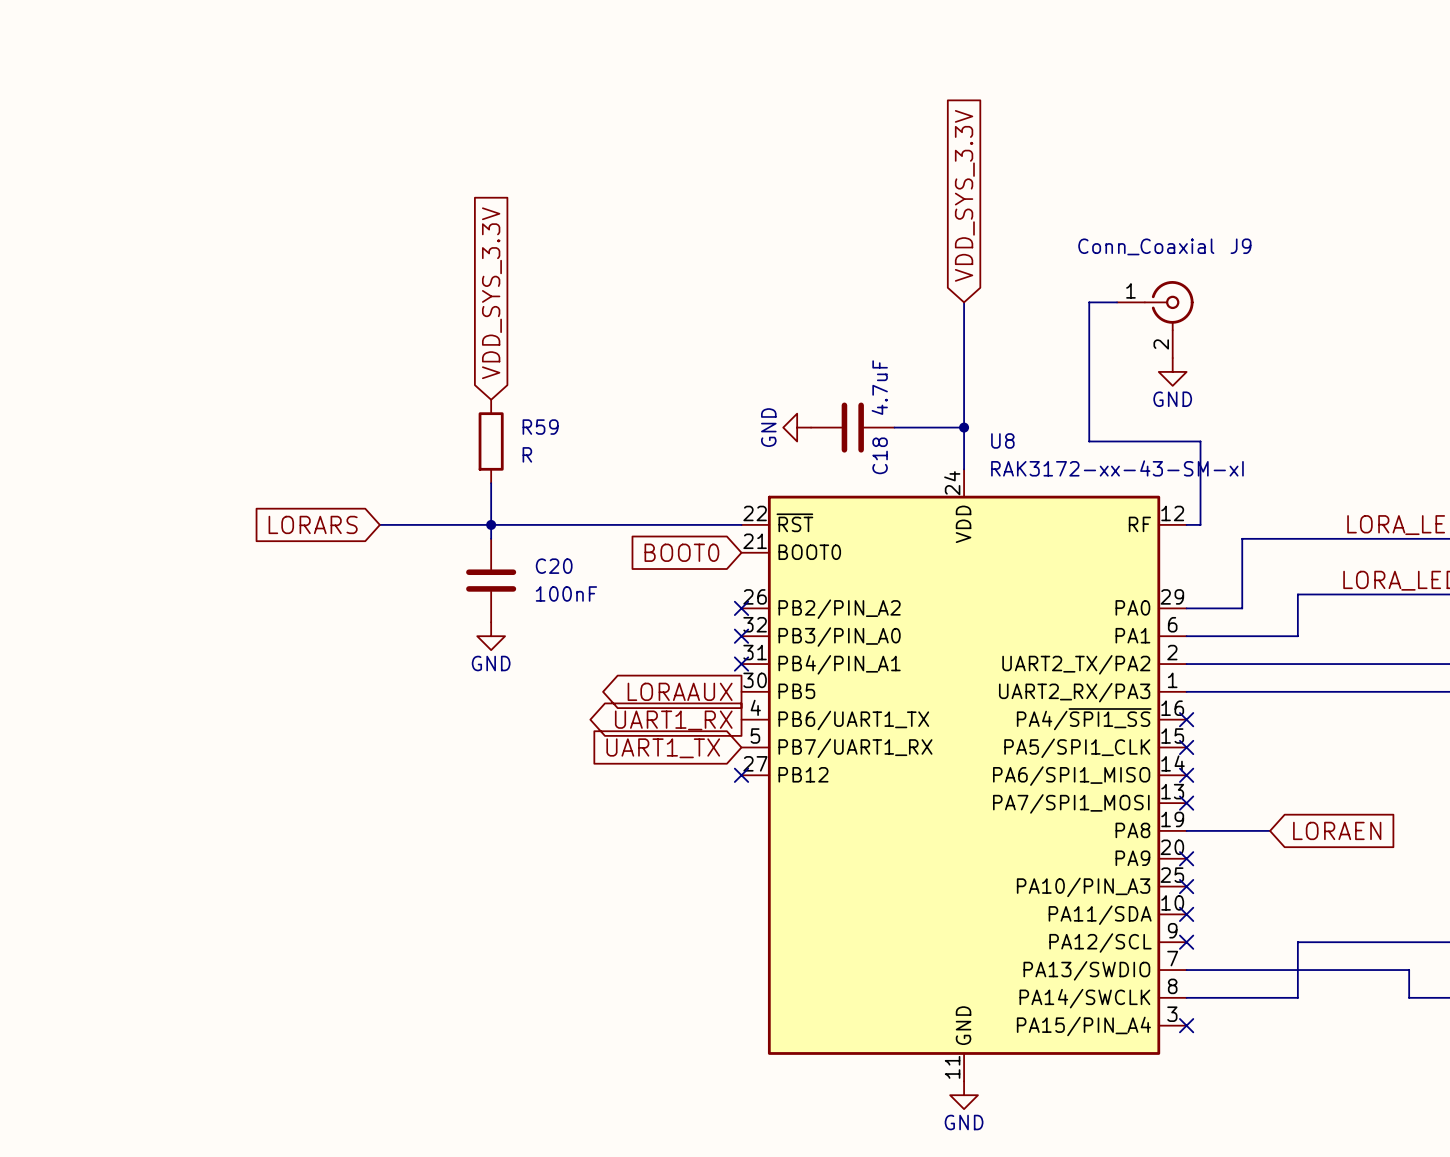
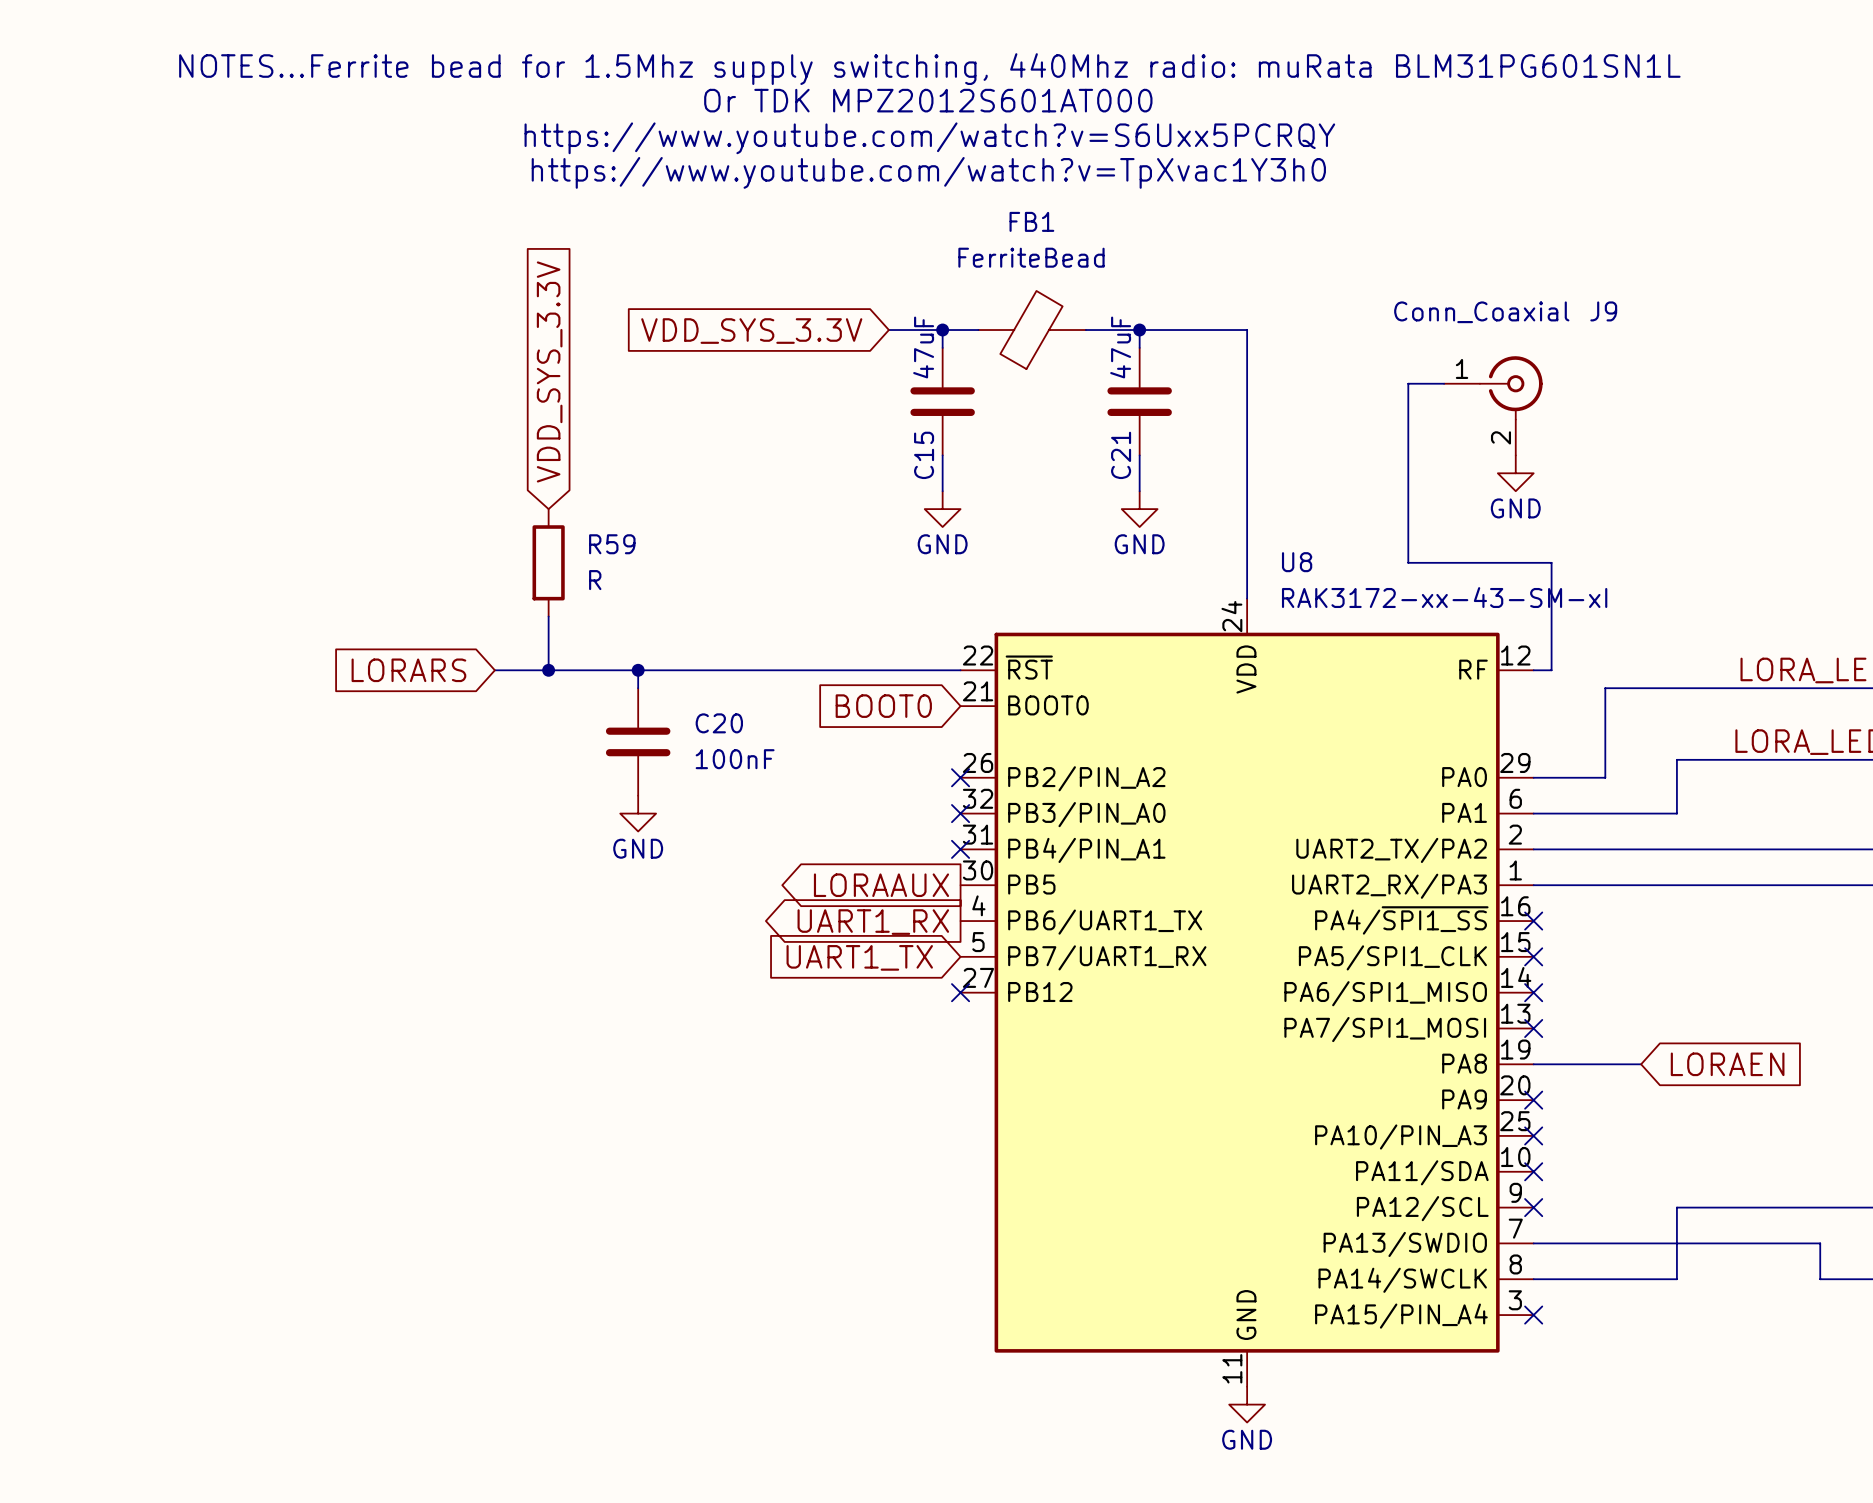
text: none -> NOTES...Ferrite bead for 1.5Mhz supply switching, 440Mhz radio: muRata BLM31PG601SN1L (929, 69)
text: none -> Or TDK MPZ2012S601AT000 (928, 100)
text: none -> https://www.youtube.com/watch?v=S6Uxx5PCRQY (929, 138)
text: none -> https://www.youtube.com/watch?v=TpXvac1Y3h0 (928, 172)
global label: VDD_SYS_3.3V (964, 195) -> none
wire: none -> (942, 330) (942, 347)
junction: none -> (942, 330)
FB1: none -> FerriteBead (1032, 330)
wire: none -> (1085, 330) (1247, 330) (1247, 383)
wire: none -> (1139, 330) (1139, 347)
junction: none -> (1139, 330)
global label: none -> VDD_SYS_3.3V (751, 331)
global label position: VDD_SYS_3.3V (491, 293) -> VDD_SYS_3.3V (549, 371)
C15: none -> 47uF (942, 401)
C21: none -> 47uF (1139, 401)
wire: none -> (942, 455) (942, 491)
wire: none -> (1139, 455) (1139, 491)
power symbol: none -> GND (942, 509)
power symbol: none -> GND (1139, 509)
power symbol: GND (797, 427) -> none
C18: 4.7uF (852, 427) -> none
wire: (894, 427) (964, 427) -> (888, 330) (978, 330)
junction: (964, 427) -> none
R59 position: (491, 441) -> (548, 562)
wire: (491, 483) (491, 524) -> (548, 616) (548, 670)
junction: none -> (548, 670)

